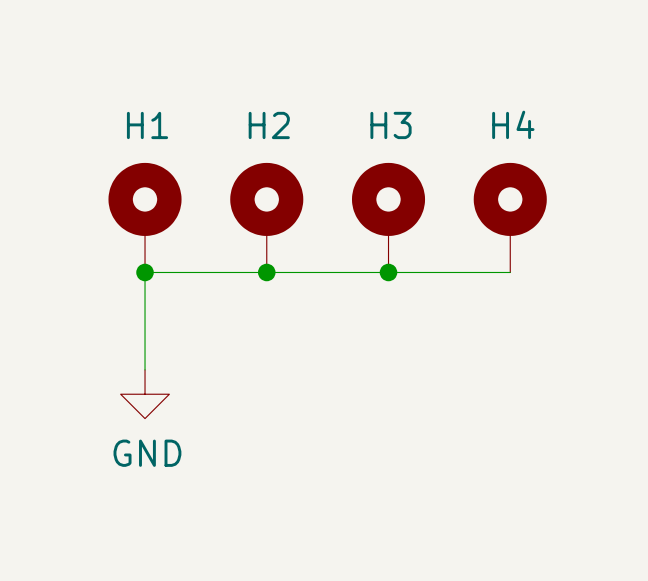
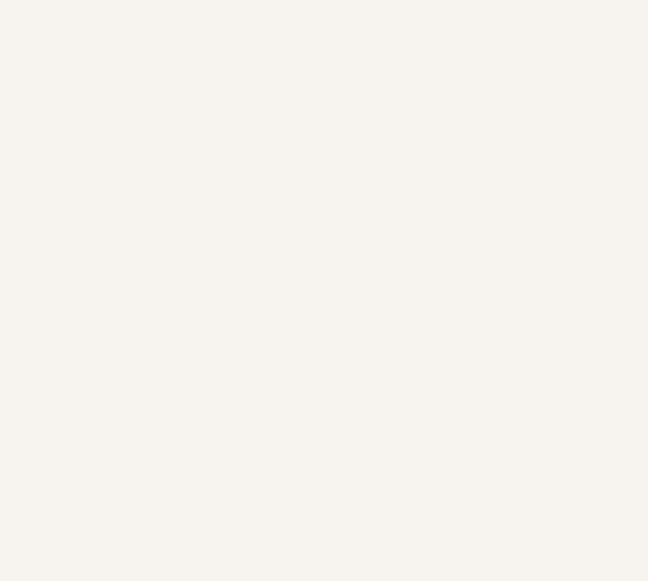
H1: (145, 217) -> none
H2: (266, 217) -> none
H3: (388, 217) -> none
H4: (510, 217) -> none
junction: (145, 272) -> none
junction: (266, 272) -> none
junction: (388, 272) -> none
wire: (510, 272) (145, 272) (145, 369) -> none
power symbol: GND (145, 394) -> none

